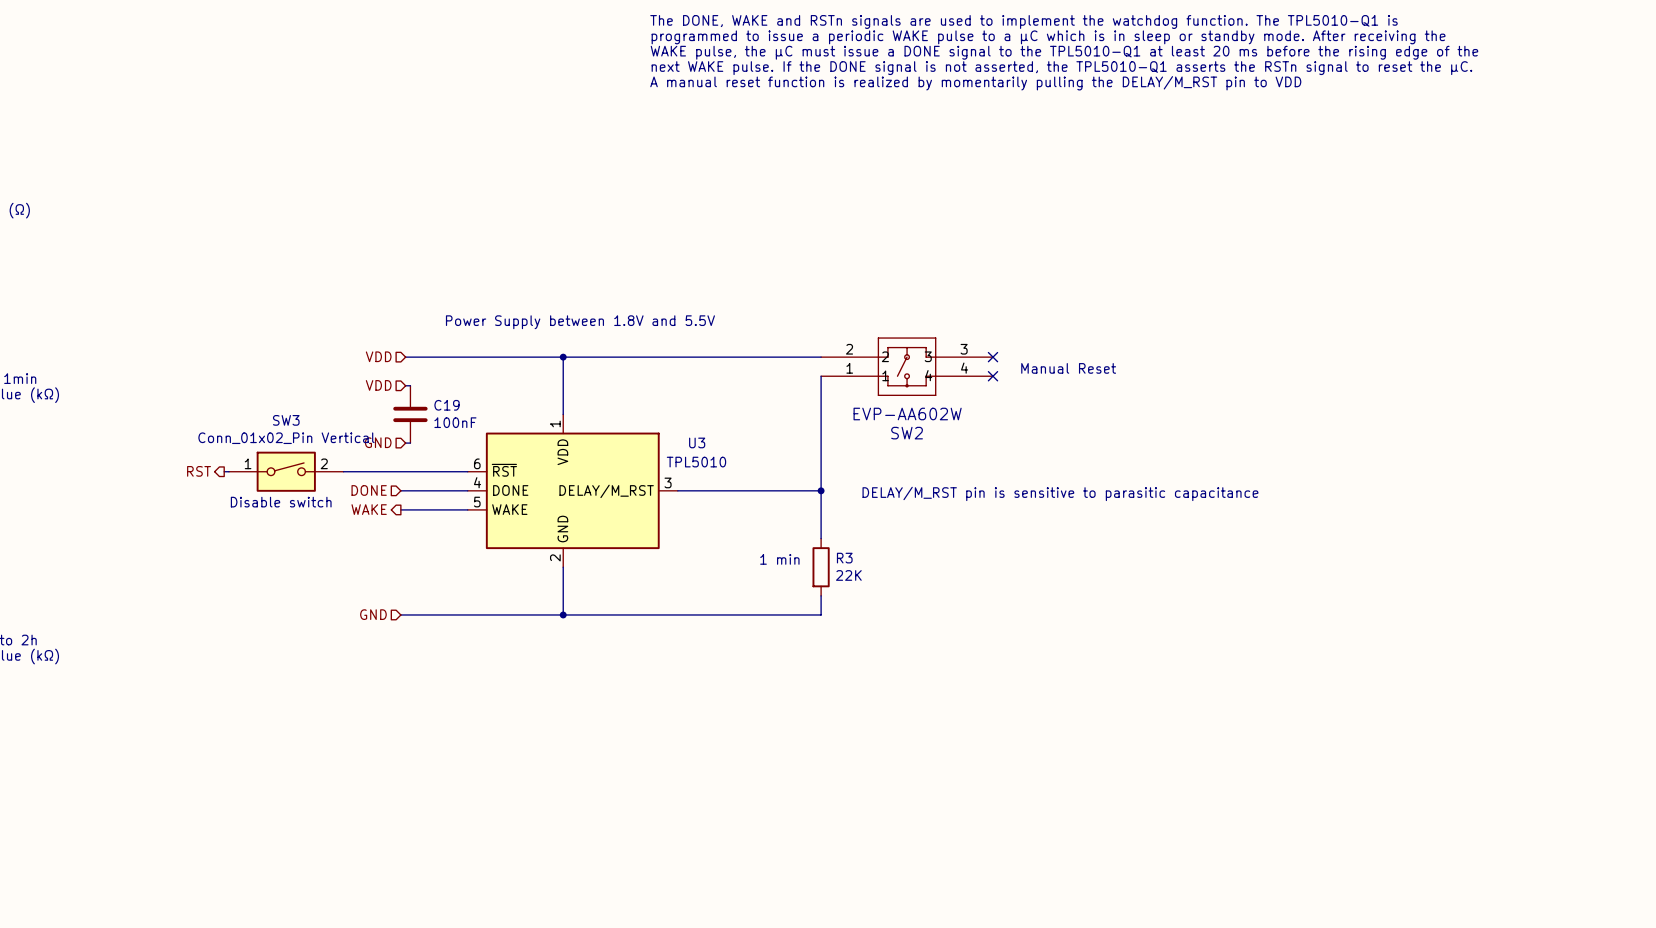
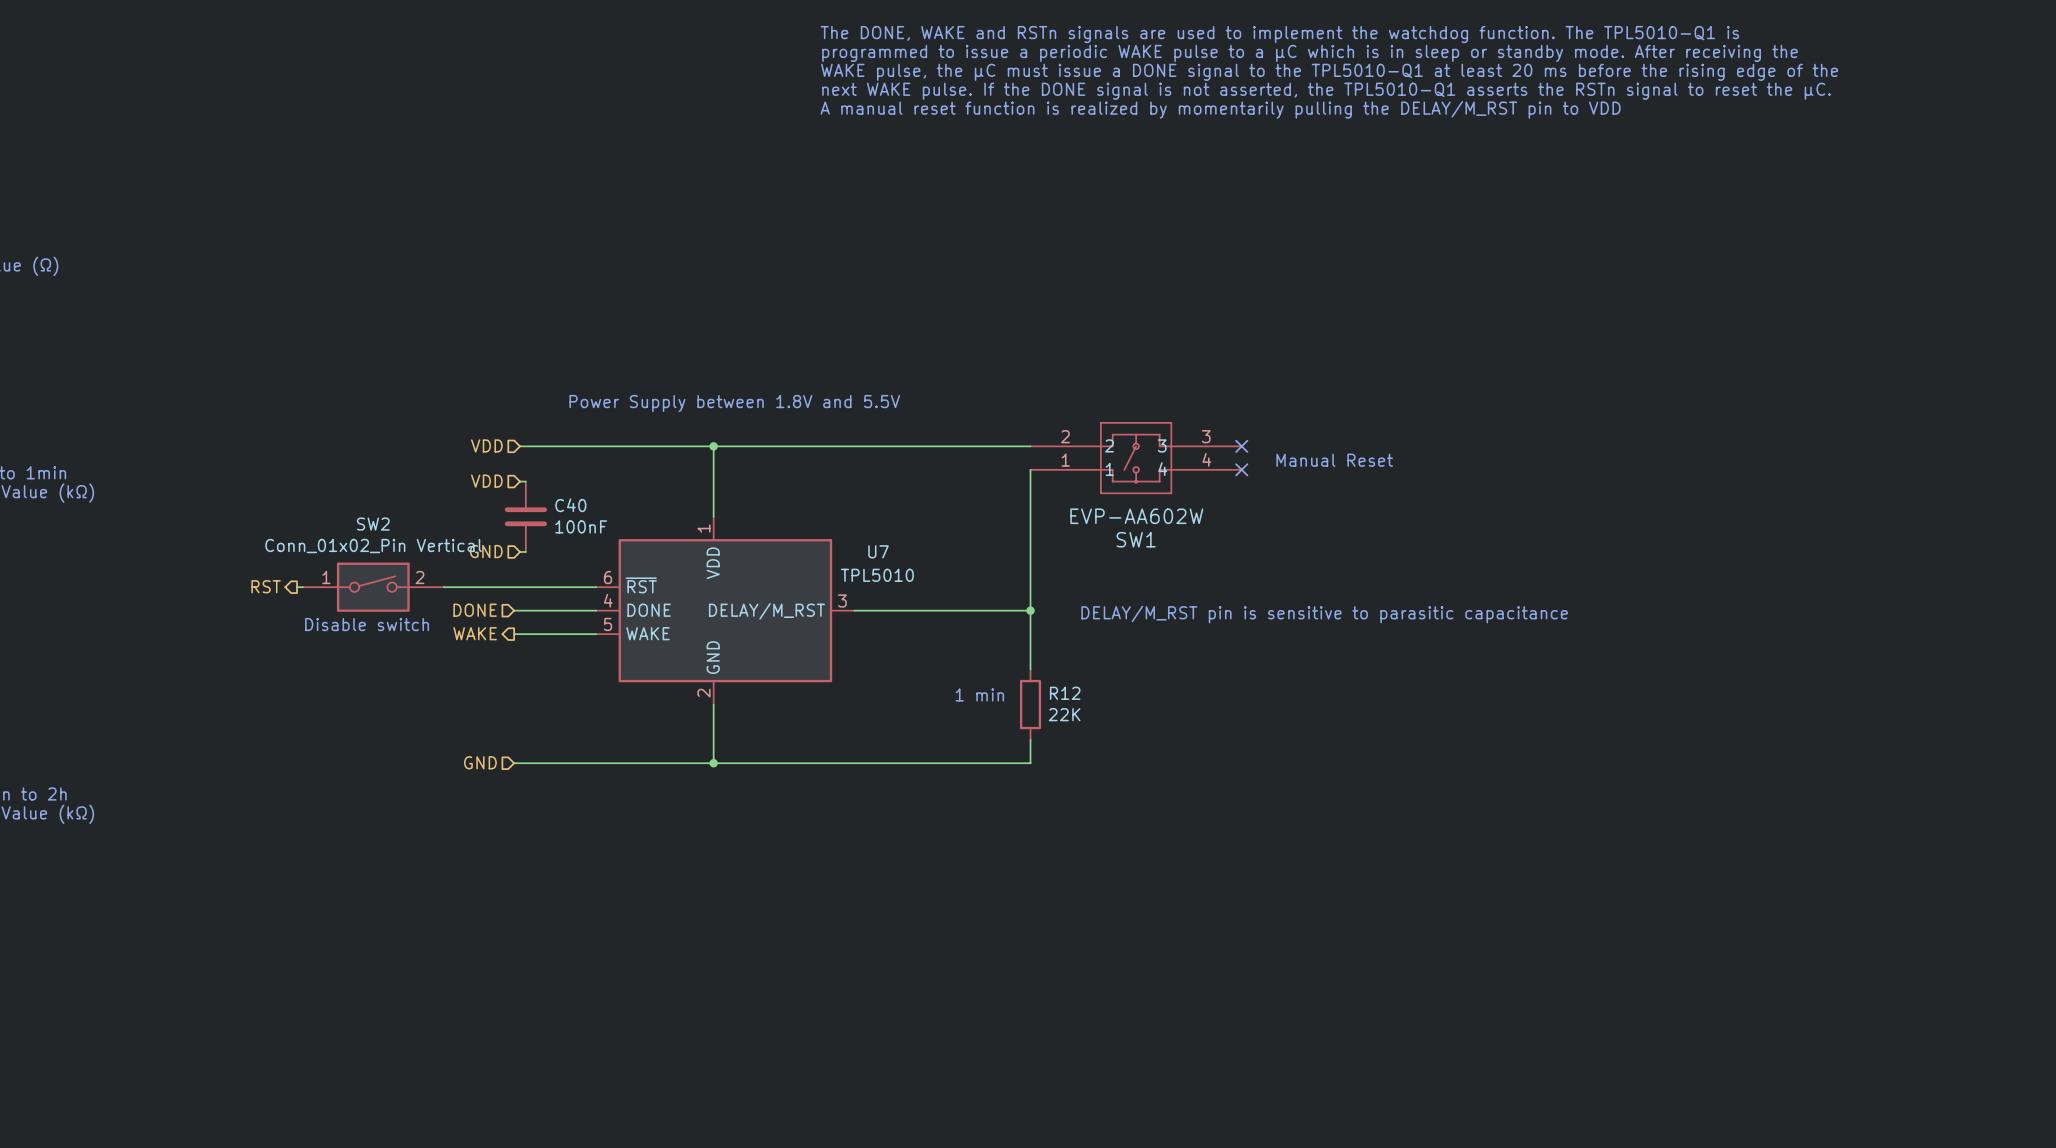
C19 name: C19 (447, 405) -> C40 (570, 505)
SW3 name: SW3 (286, 420) -> SW2 (373, 524)
SW2 name: SW2 (907, 433) -> SW1 (1136, 539)
U3 name: U3 (697, 442) -> U7 (878, 551)
R3 name: R3 (844, 558) -> R12 (1065, 693)

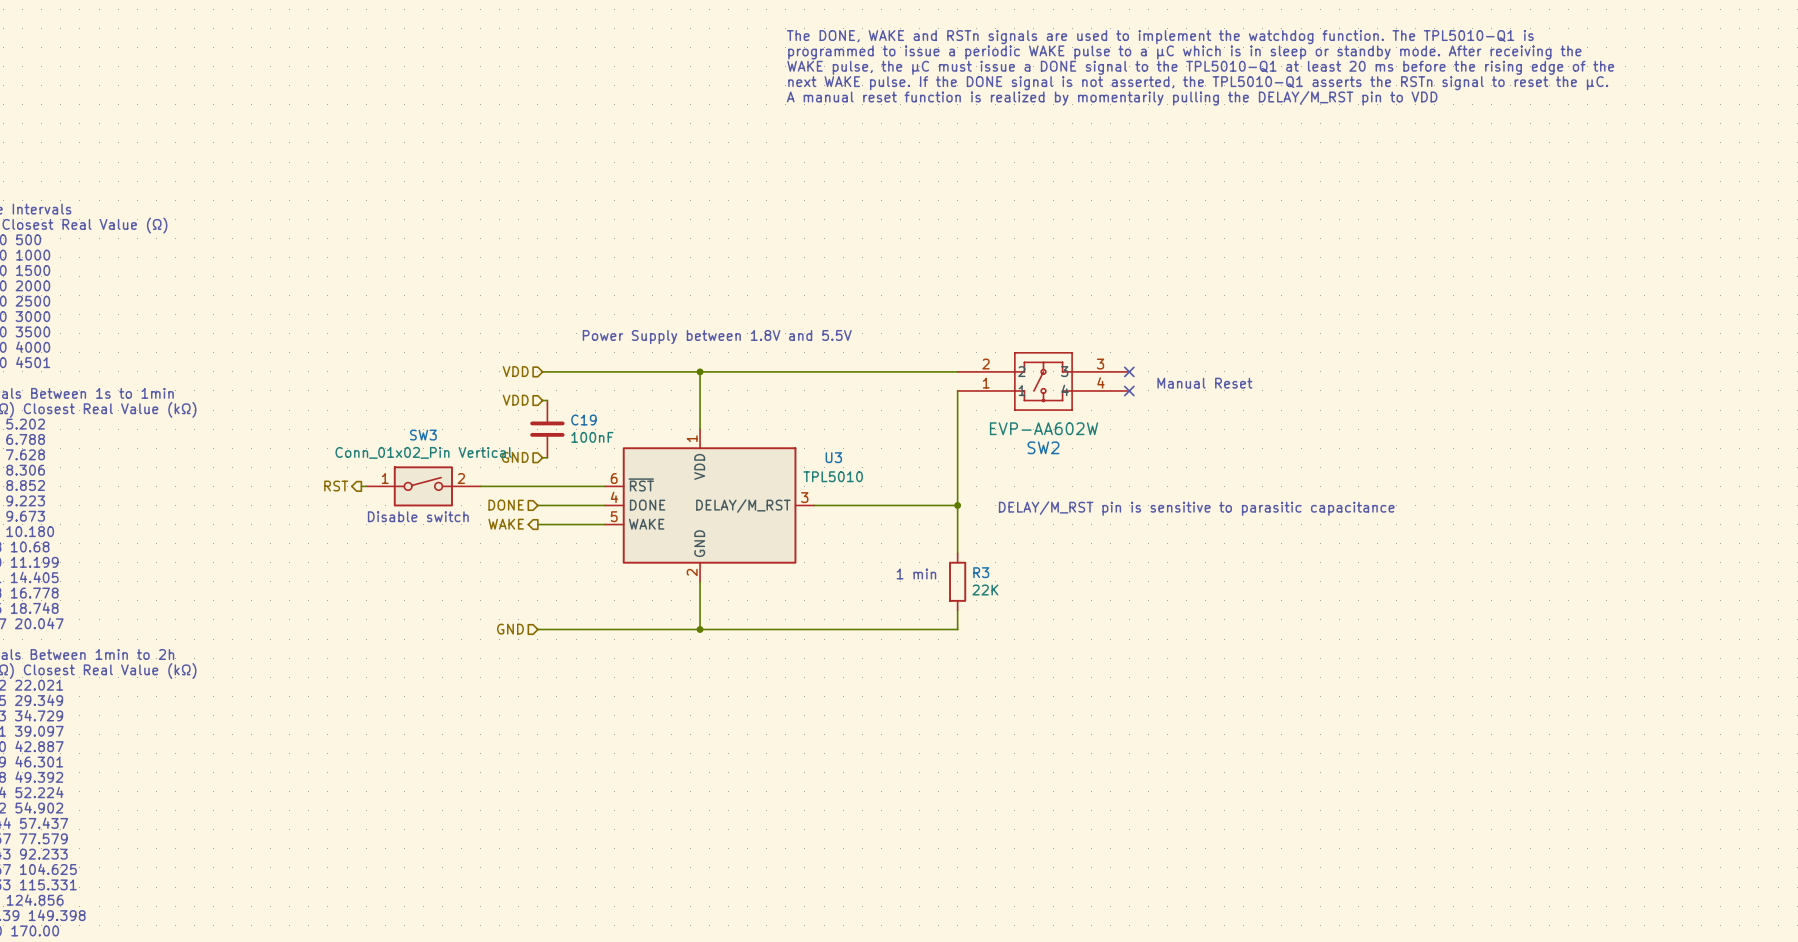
C40 name: C40 (570, 505) -> C19 (583, 420)
SW2 name: SW2 (373, 524) -> SW3 (423, 435)
SW1 name: SW1 (1136, 539) -> SW2 (1043, 447)
U7 name: U7 (878, 551) -> U3 (833, 457)
R12 name: R12 (1065, 693) -> R3 (981, 572)

